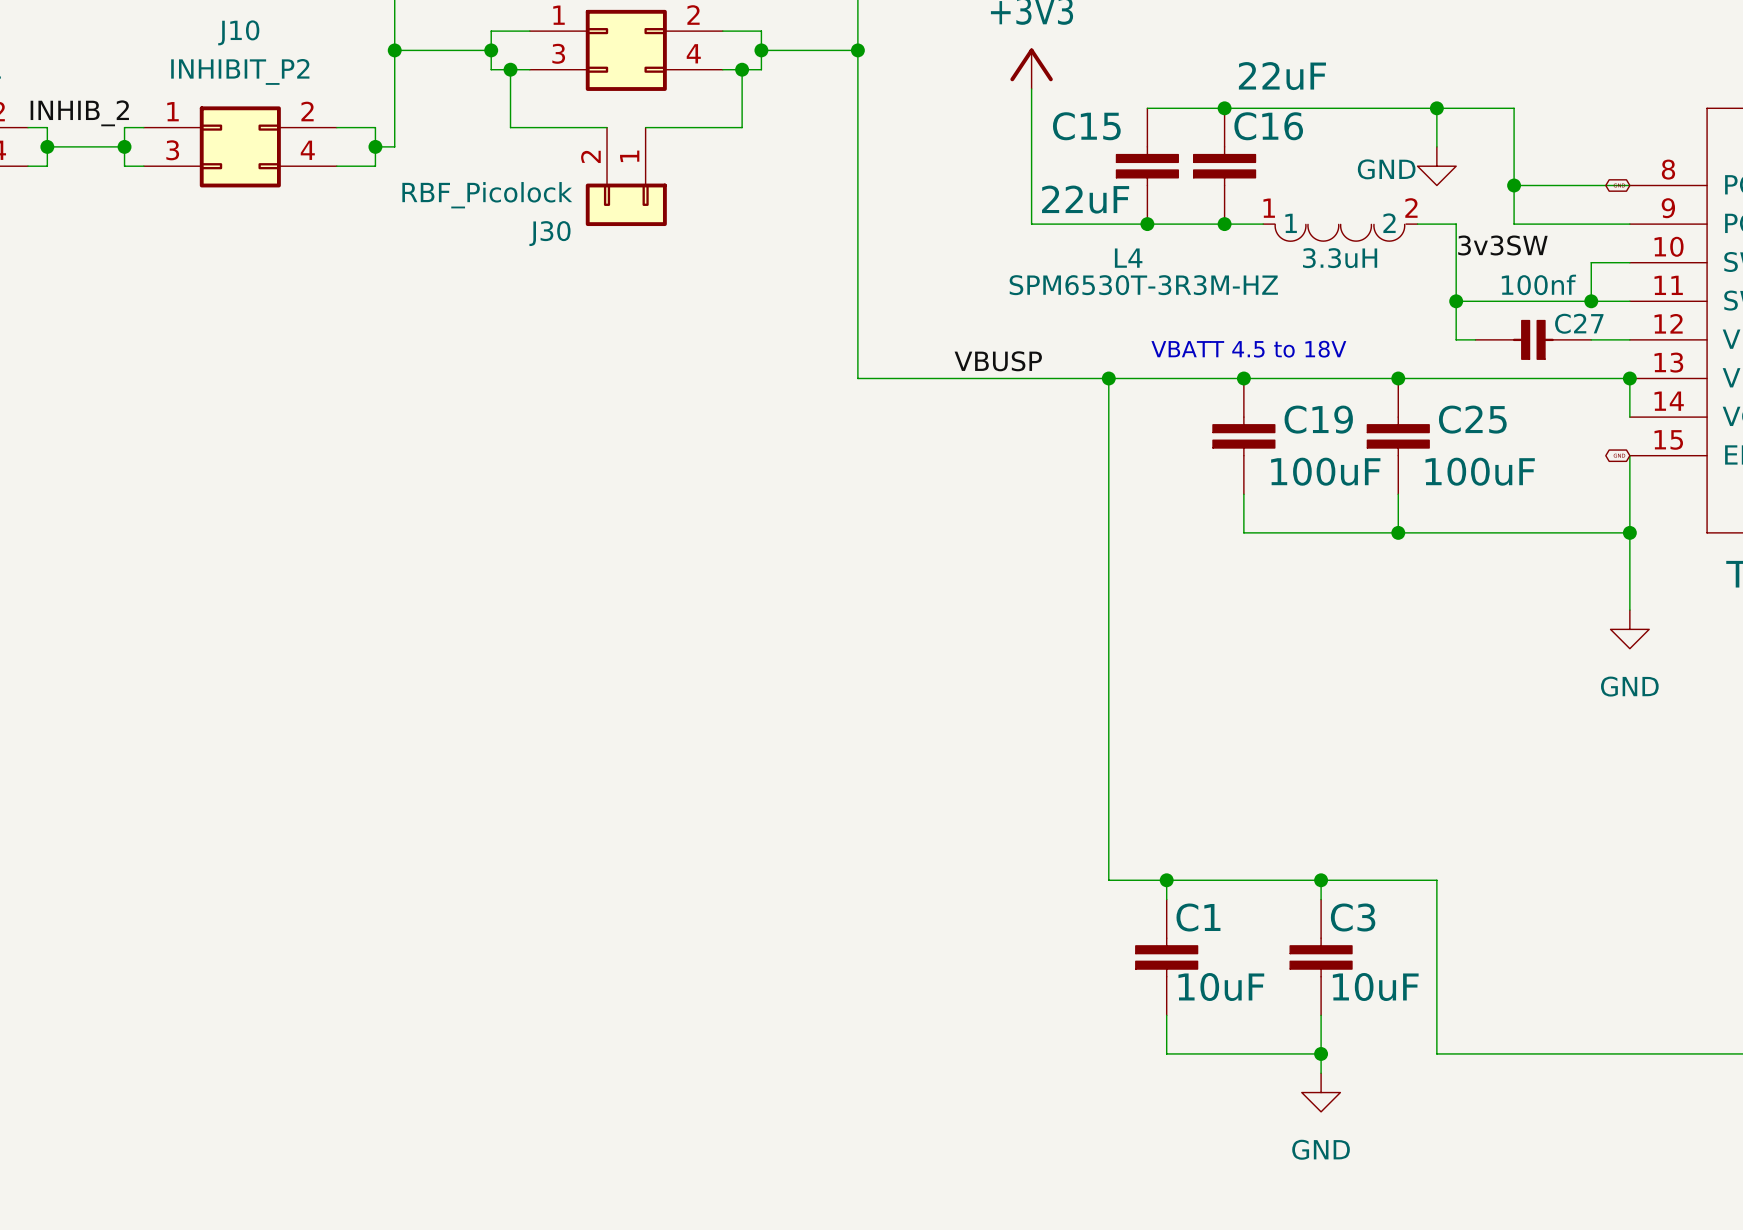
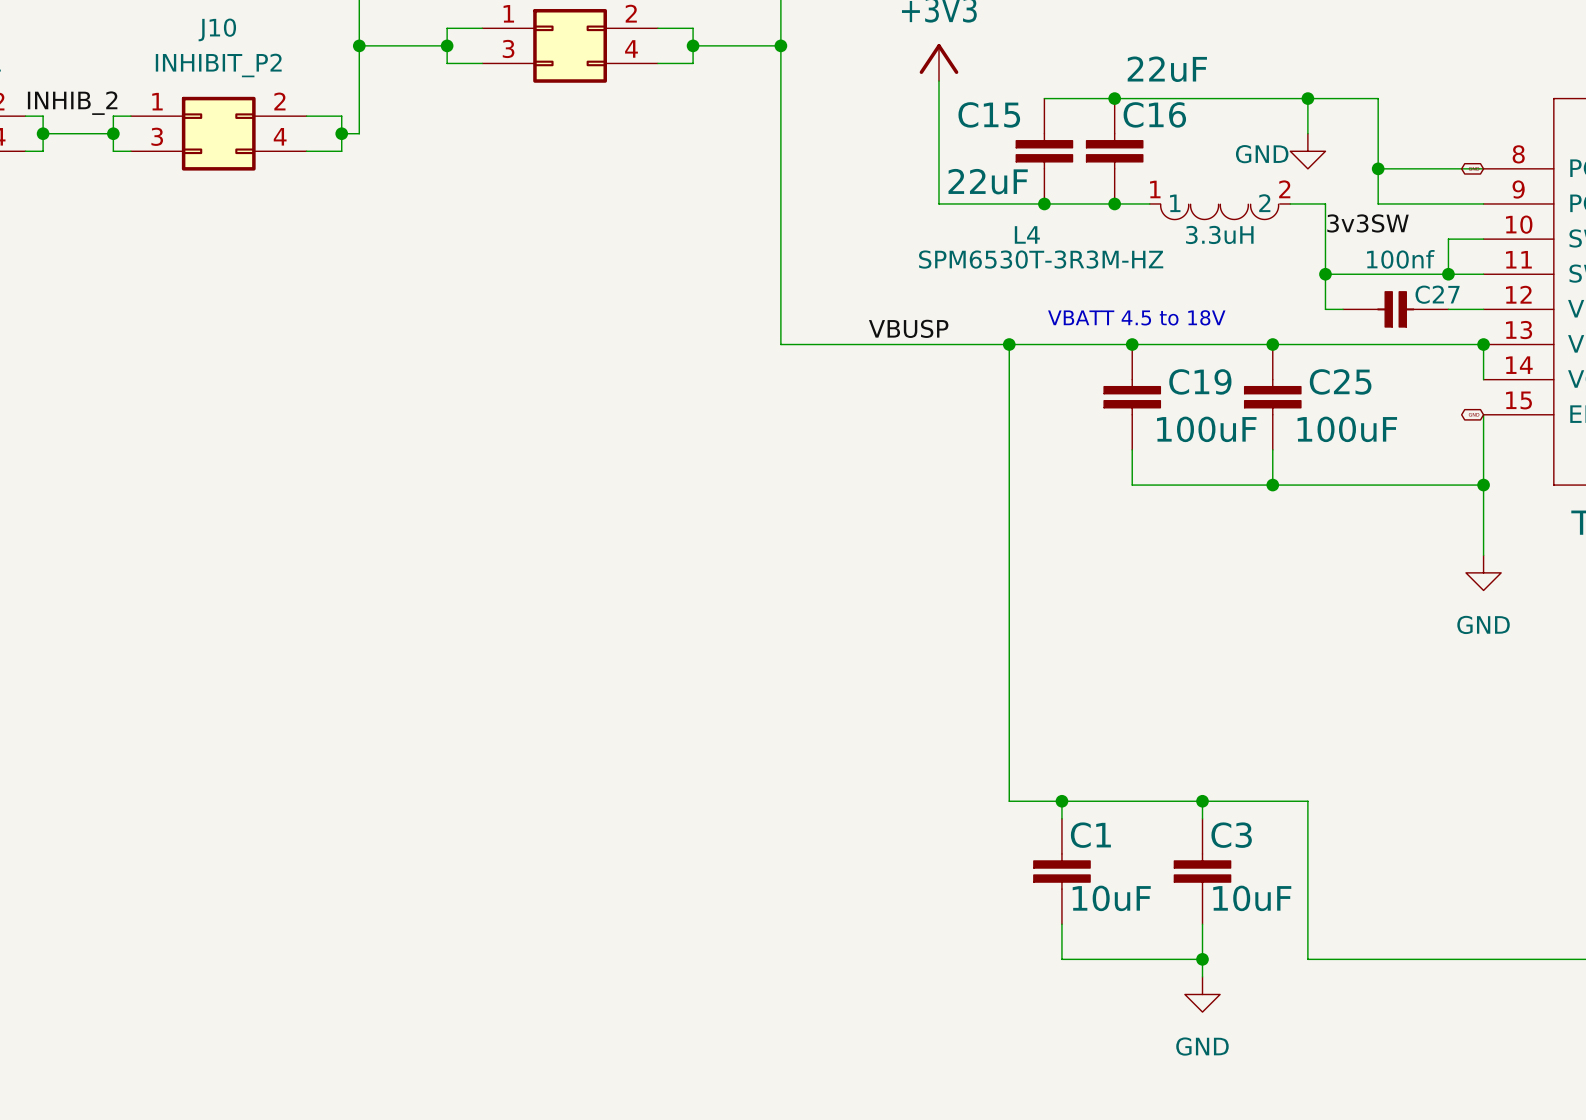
wire: (510, 69) (510, 127) (607, 127) -> none
junction: (510, 69) -> none
wire: (742, 69) (742, 127) (645, 127) -> none
junction: (742, 69) -> none
J30: RBF_Picolock (626, 176) -> none

